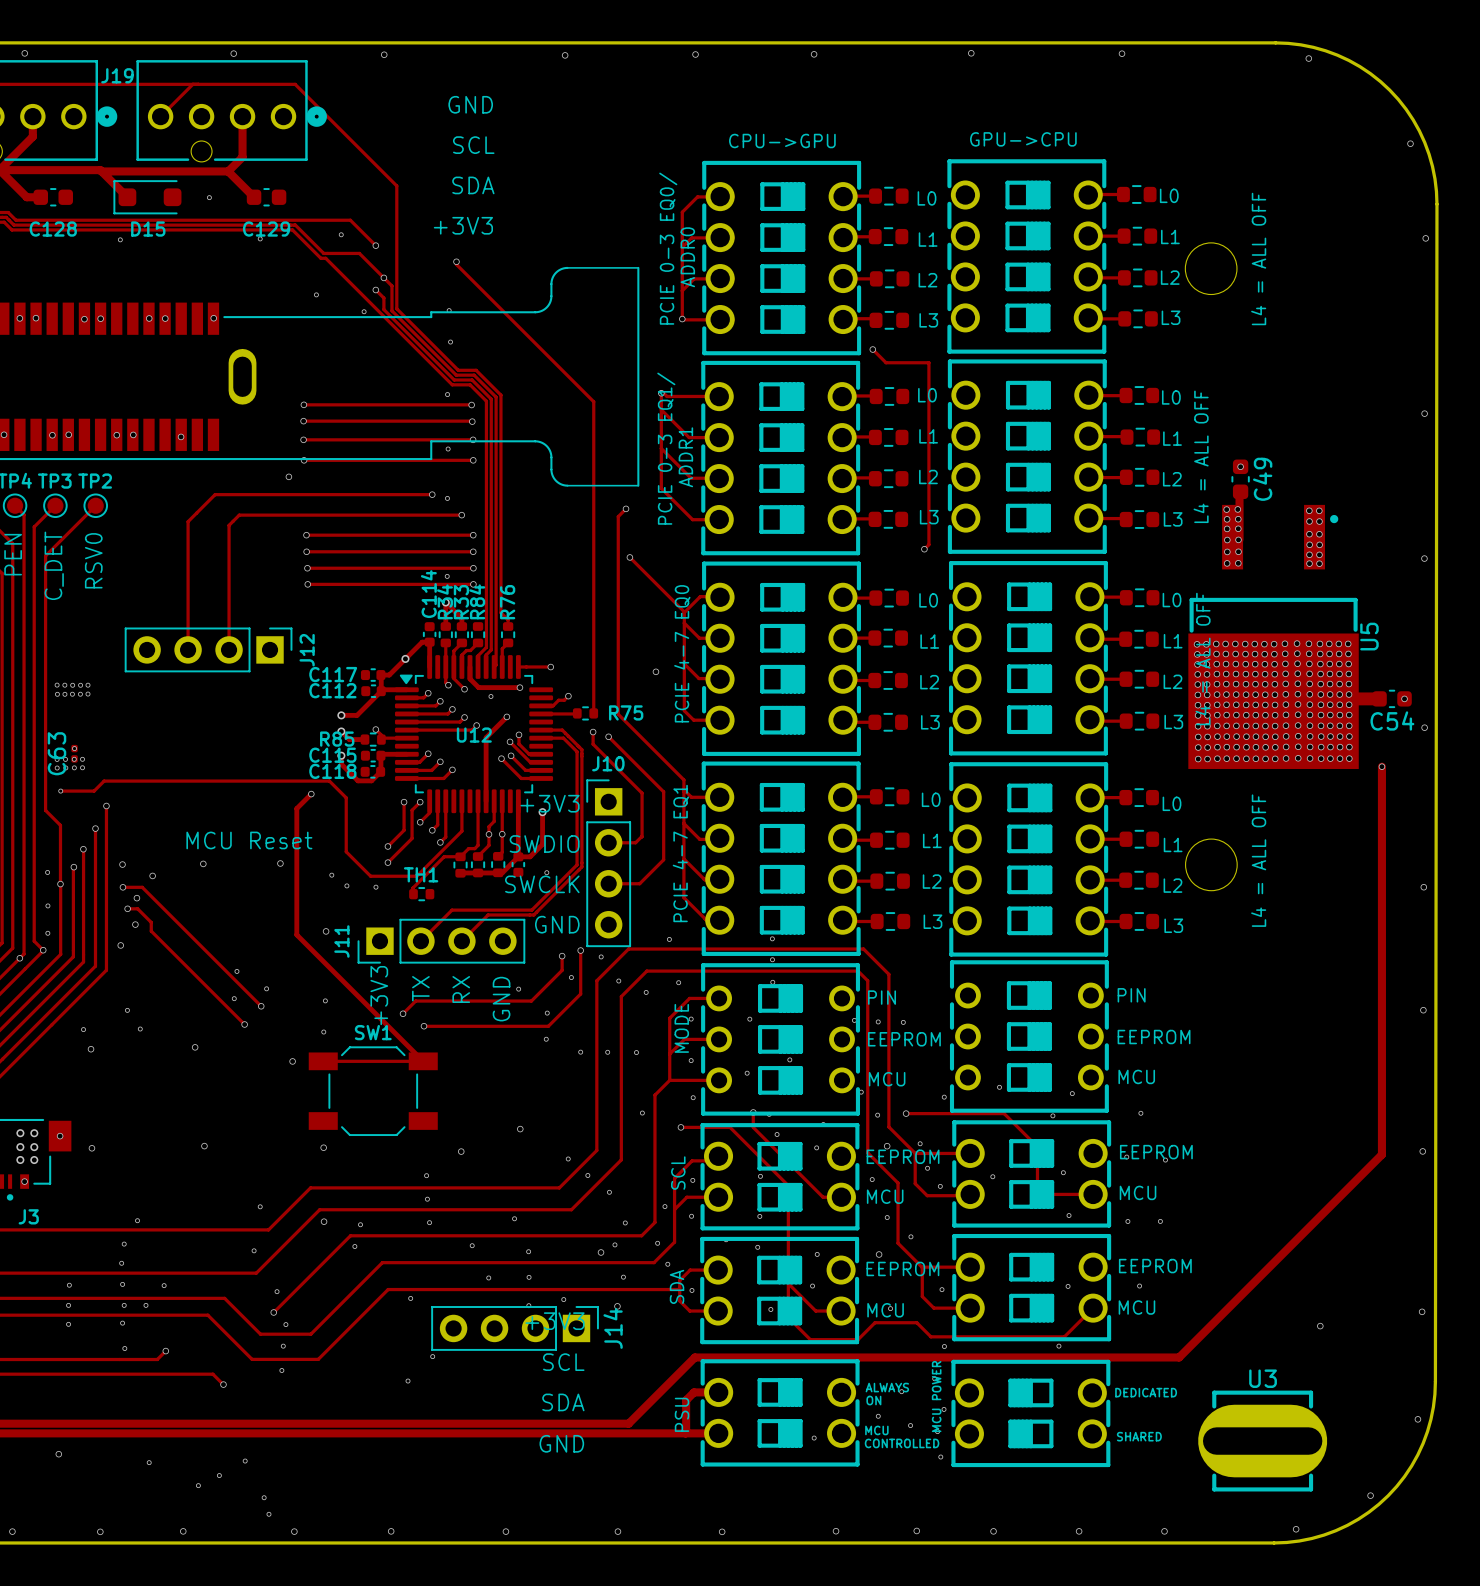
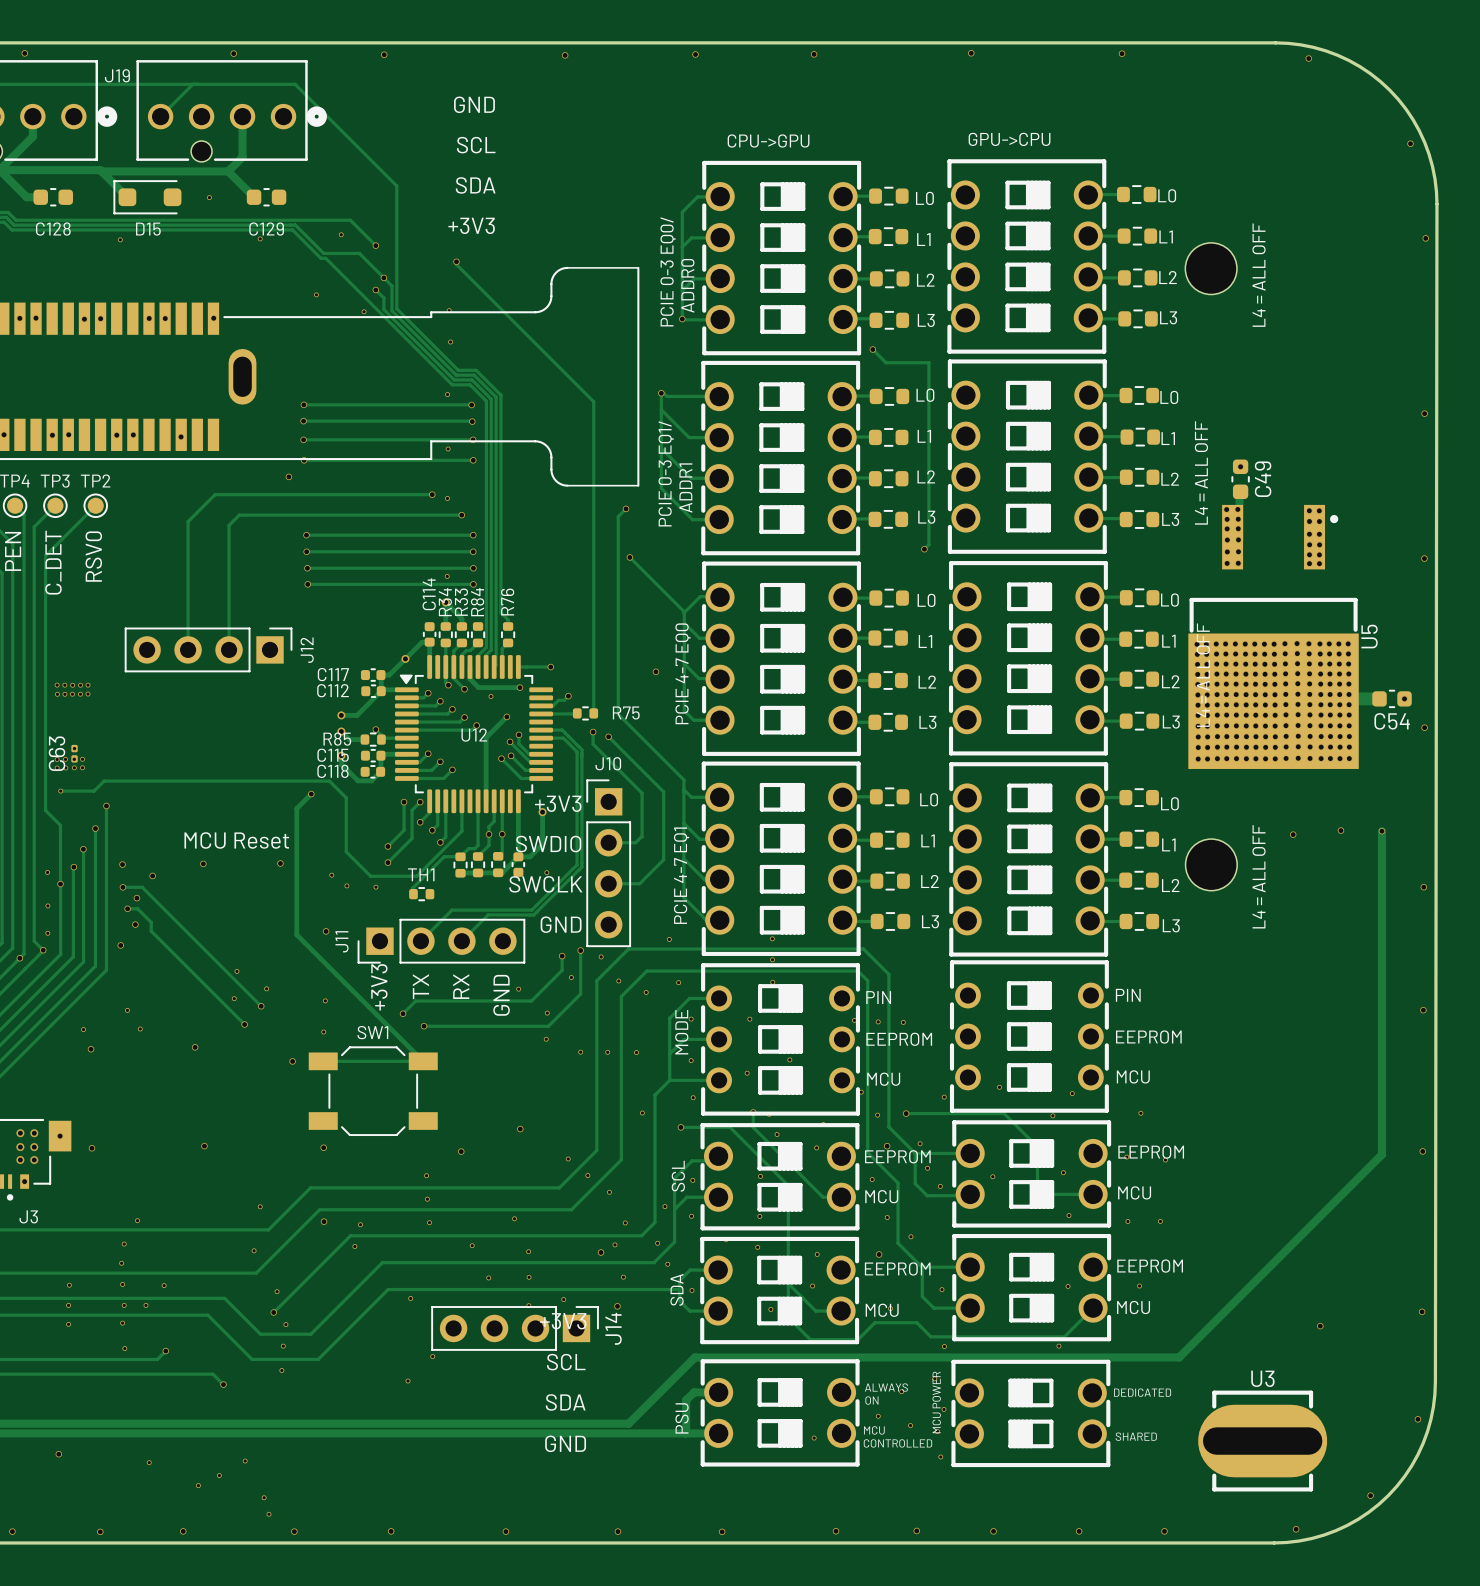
track: (1381, 766) (1381, 831) -> none
via: (1381, 766) -> none
via: none -> (1340, 830)
via: none -> (1381, 831)
via: none -> (1293, 834)

